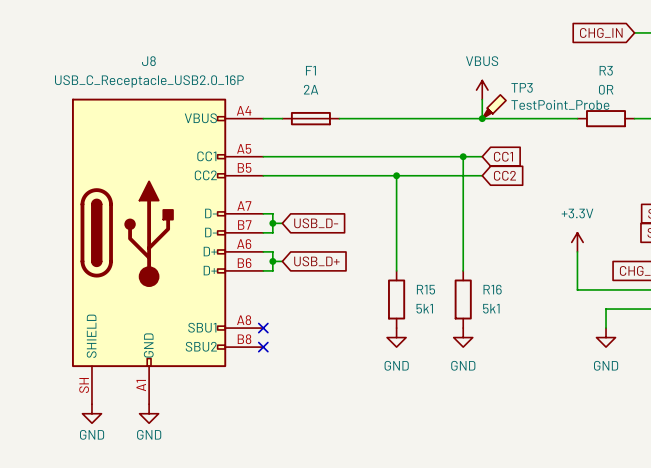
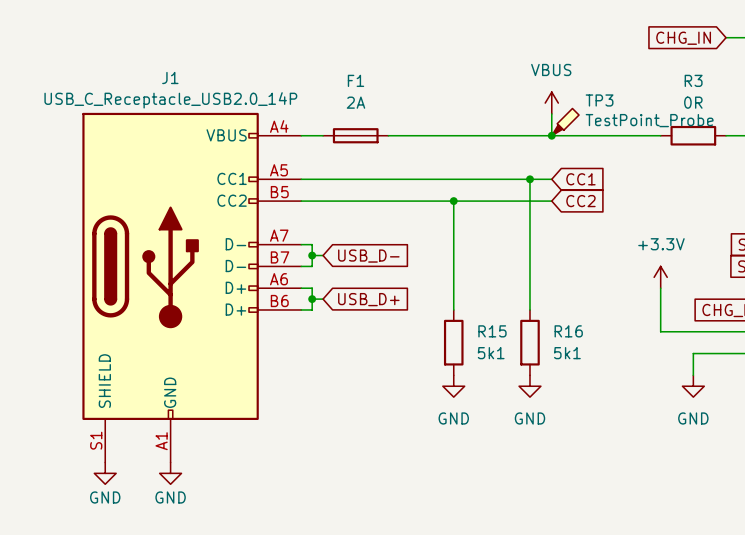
J8: USB_C_Receptacle_USB2.0_16P (167, 251) -> none
J1: none -> USB_C_Receptacle_USB2.0_14P (191, 287)
no-connect mark: (263, 328) -> none
no-connect mark: (263, 347) -> none

